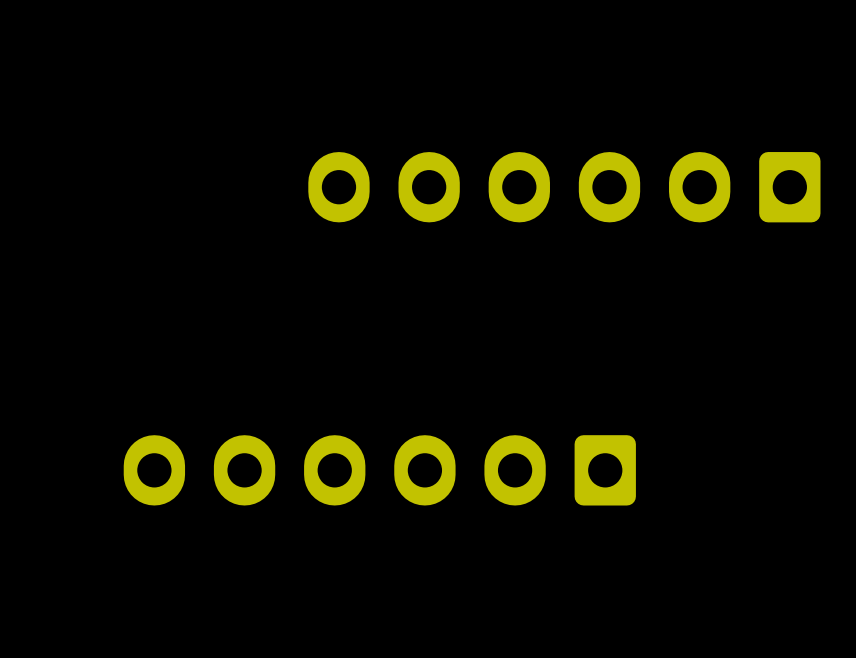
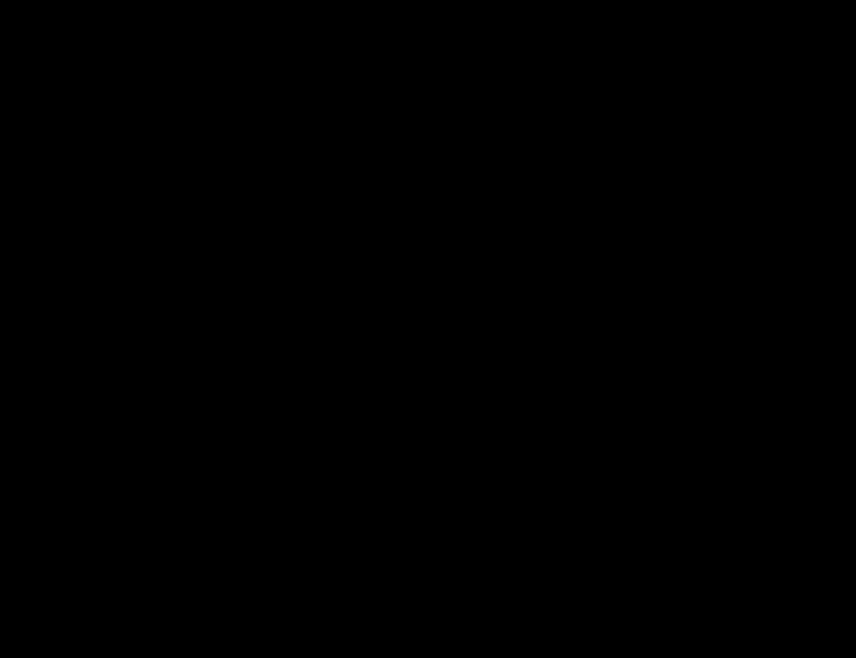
part: (564, 187) -> none
part: (379, 470) -> none

